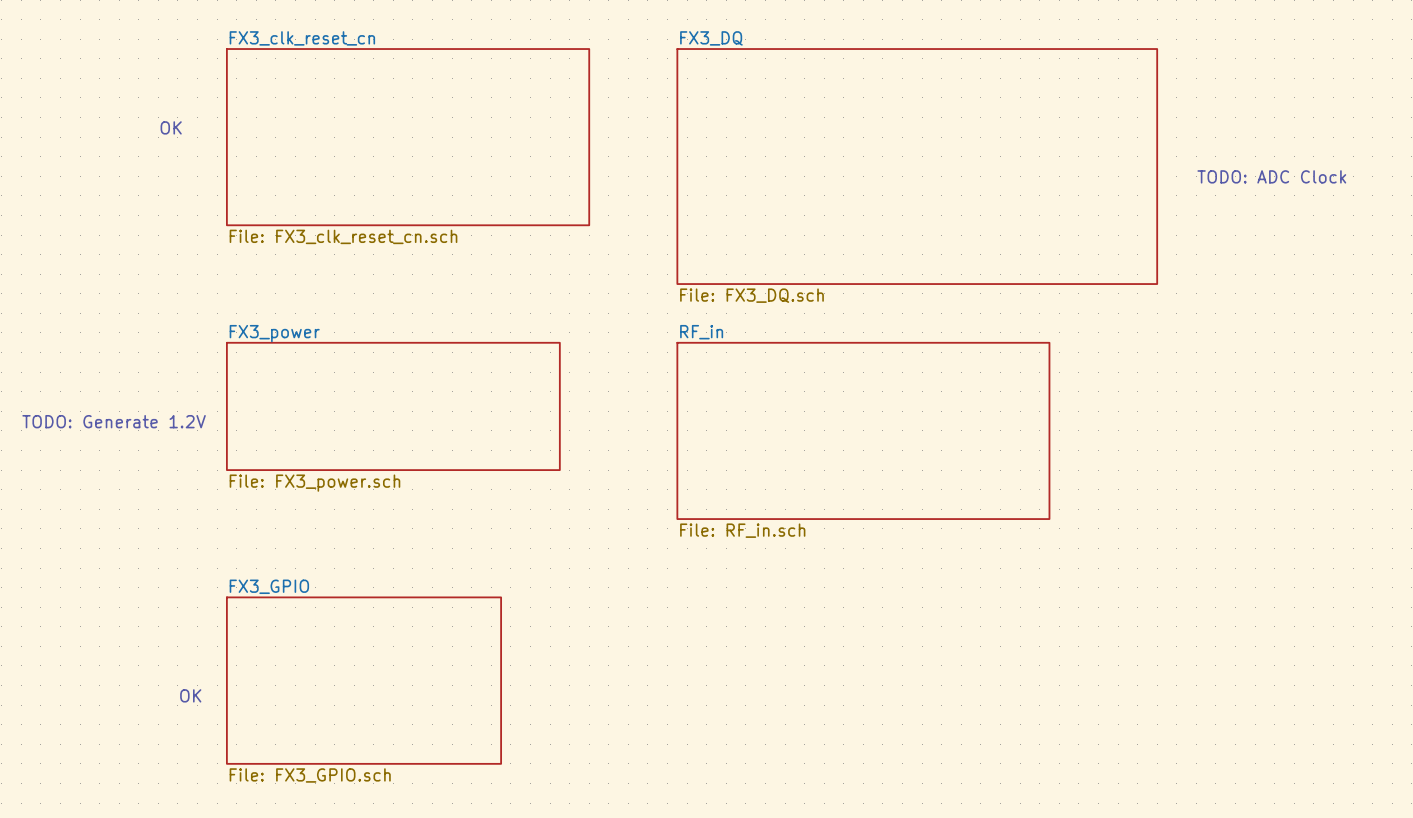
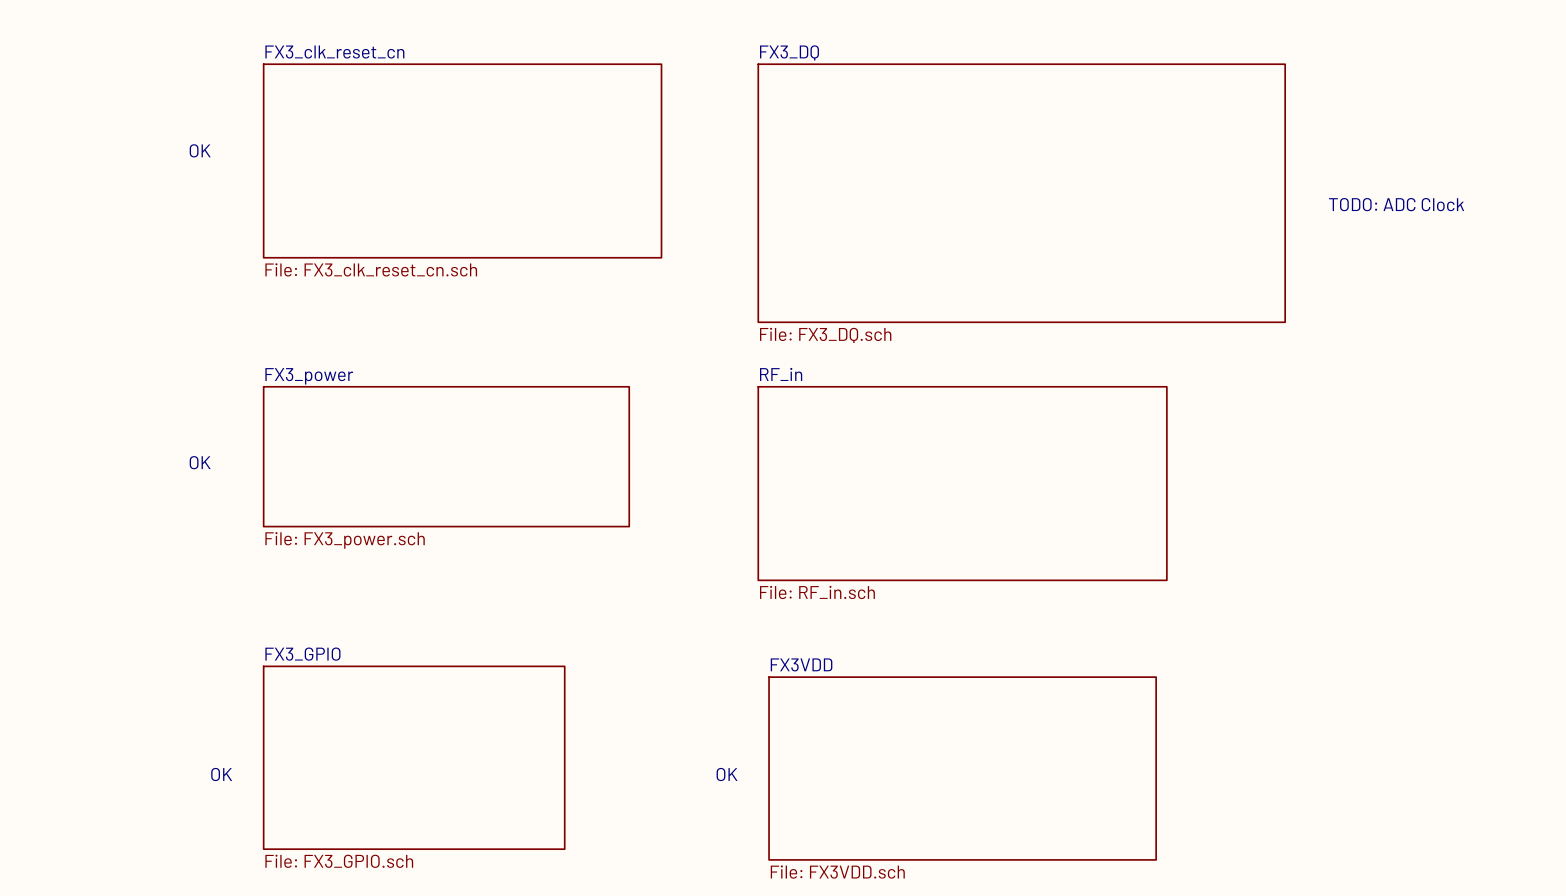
text: none -> OK (200, 462)
text: TODO: Generate 1.2V (114, 421) -> none
sheet FX3VDD: none -> File: FX3VDD.sch (962, 768)
text: none -> OK (727, 774)

